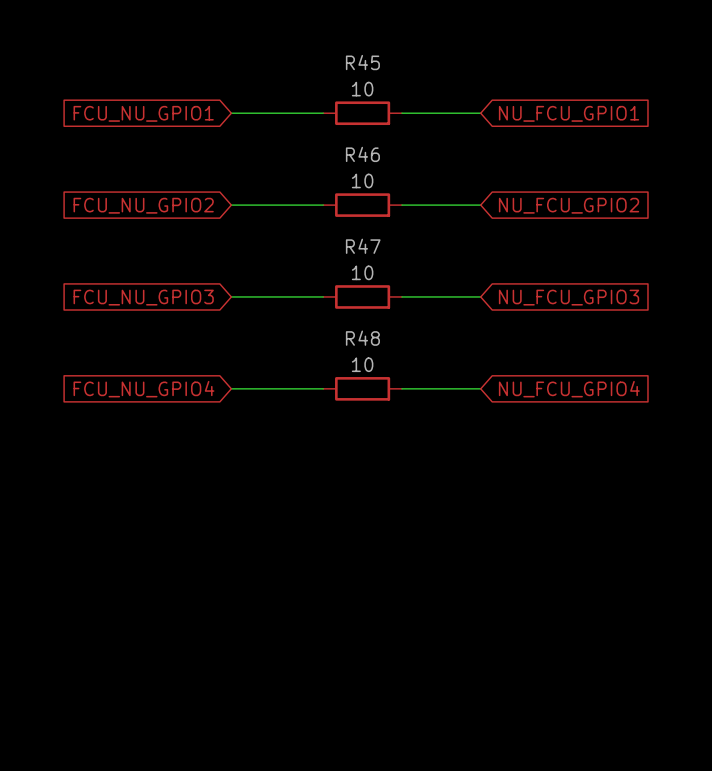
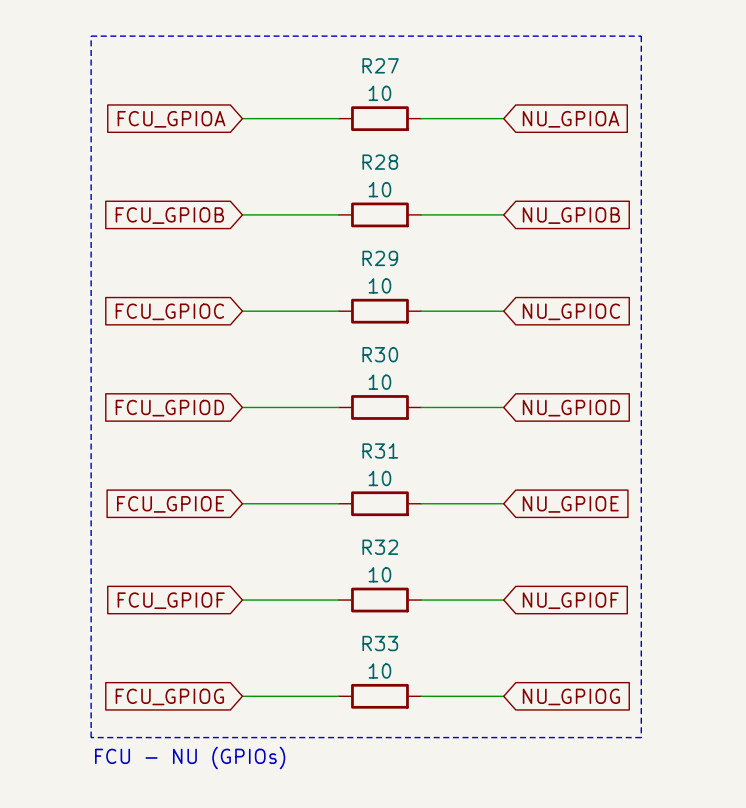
line: none -> (91, 36) (641, 36) (641, 737) (91, 737) (91, 36)
R45 name: R45 (362, 62) -> R27 (380, 65)
global label: FCU_NU_GPIO1 (143, 113) -> FCU_GPIOA (171, 119)
global label: NU_FCU_GPIO1 (569, 113) -> NU_GPIOA (571, 119)
R46 name: R46 (362, 154) -> R28 (380, 162)
global label: FCU_NU_GPIO2 (143, 205) -> FCU_GPIOB (169, 215)
global label: NU_FCU_GPIO2 (569, 205) -> NU_GPIOB (571, 215)
R47 name: R47 (363, 246) -> R29 (380, 258)
global label: FCU_NU_GPIO3 (143, 297) -> FCU_GPIOC (169, 311)
global label: NU_FCU_GPIO3 (569, 297) -> NU_GPIOC (571, 311)
R48 name: R48 (362, 338) -> R30 (380, 354)
global label: FCU_NU_GPIO4 (143, 389) -> FCU_GPIOD (169, 408)
global label: NU_FCU_GPIO4 (569, 389) -> NU_GPIOD (571, 408)
wire: none -> (242, 503) (338, 503)
R31: none -> 10 (379, 503)
wire: none -> (421, 503) (503, 503)
global label: none -> FCU_GPIOE (170, 504)
global label: none -> NU_GPIOE (570, 504)
wire: none -> (242, 600) (338, 600)
R32: none -> 10 (379, 600)
wire: none -> (421, 600) (503, 600)
global label: none -> FCU_GPIOF (171, 600)
global label: none -> NU_GPIOF (570, 600)
wire: none -> (242, 696) (338, 696)
R33: none -> 10 (379, 696)
wire: none -> (421, 696) (503, 696)
global label: none -> FCU_GPIOG (169, 696)
global label: none -> NU_GPIOG (571, 696)
text: none -> FCU - NU (GPIOs) (190, 757)

